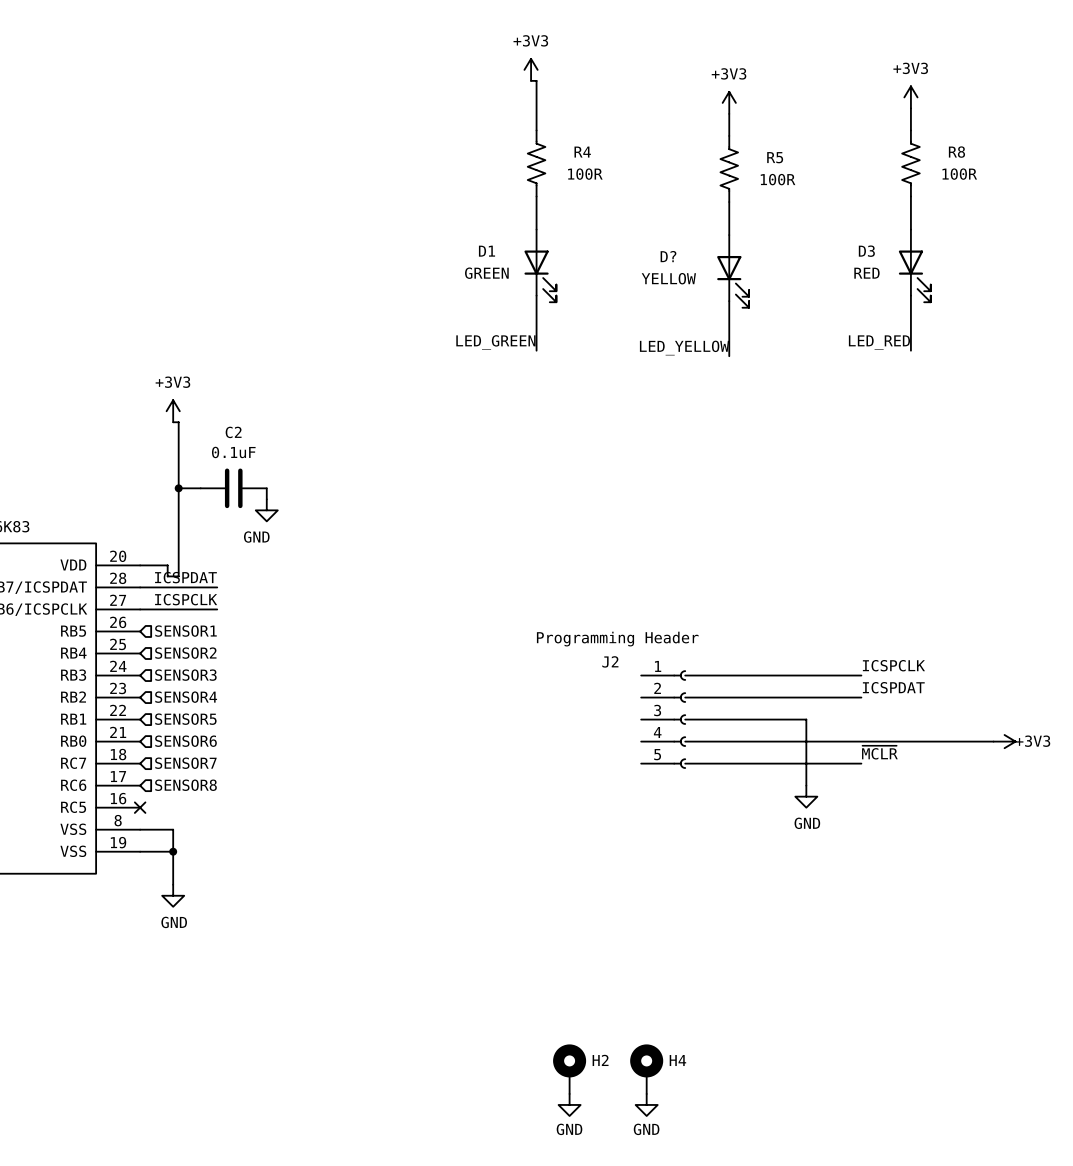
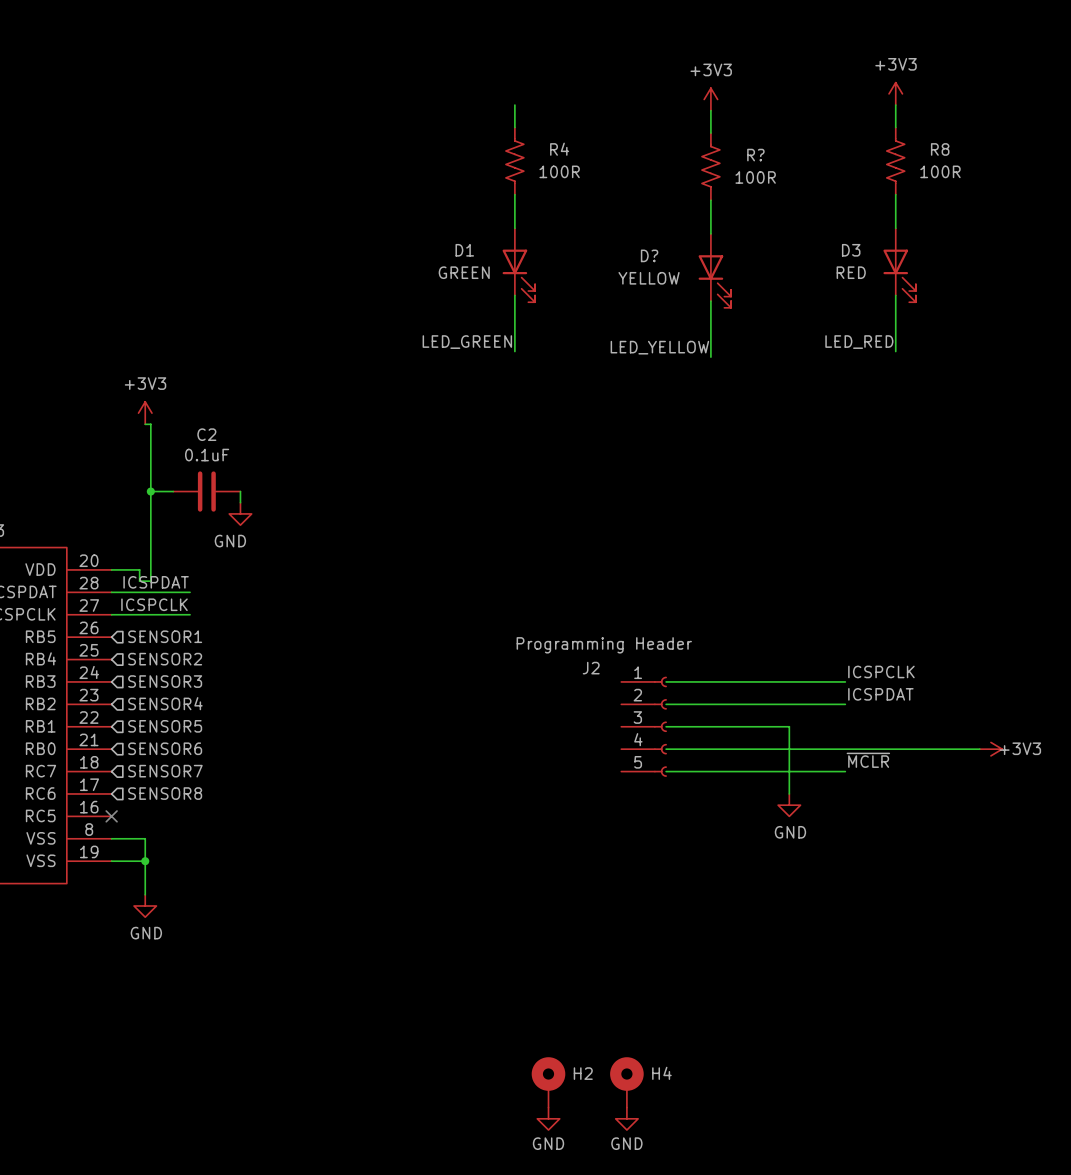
power symbol: +3V3 (531, 69) -> none
wire: (531, 80) (536, 80) (536, 108) -> none
R5 name: R5 (775, 157) -> R? (755, 155)

